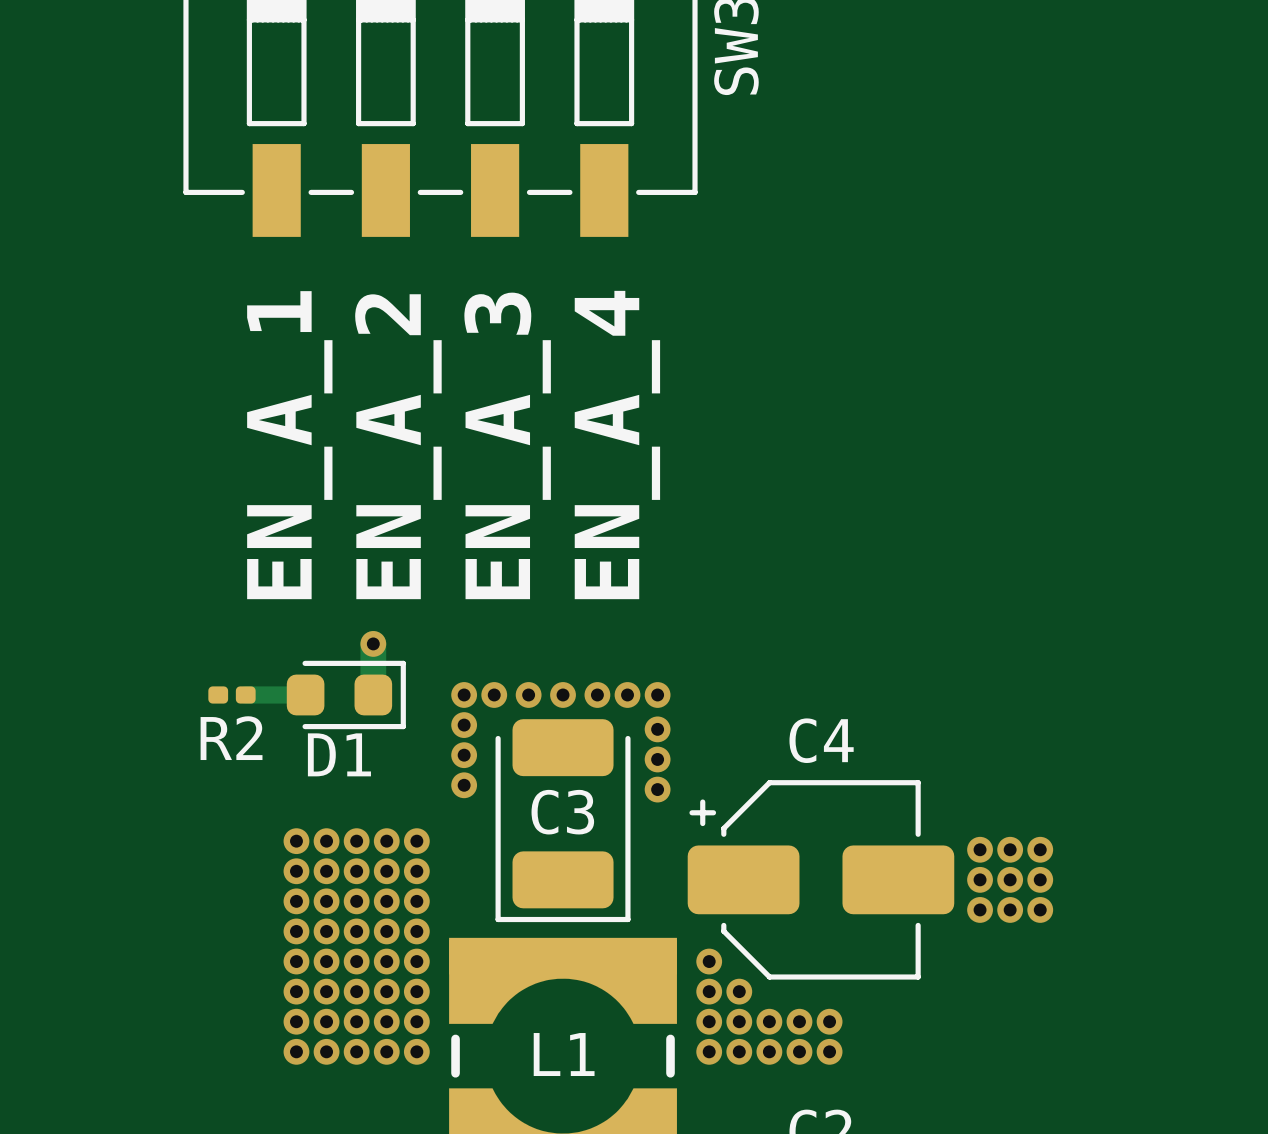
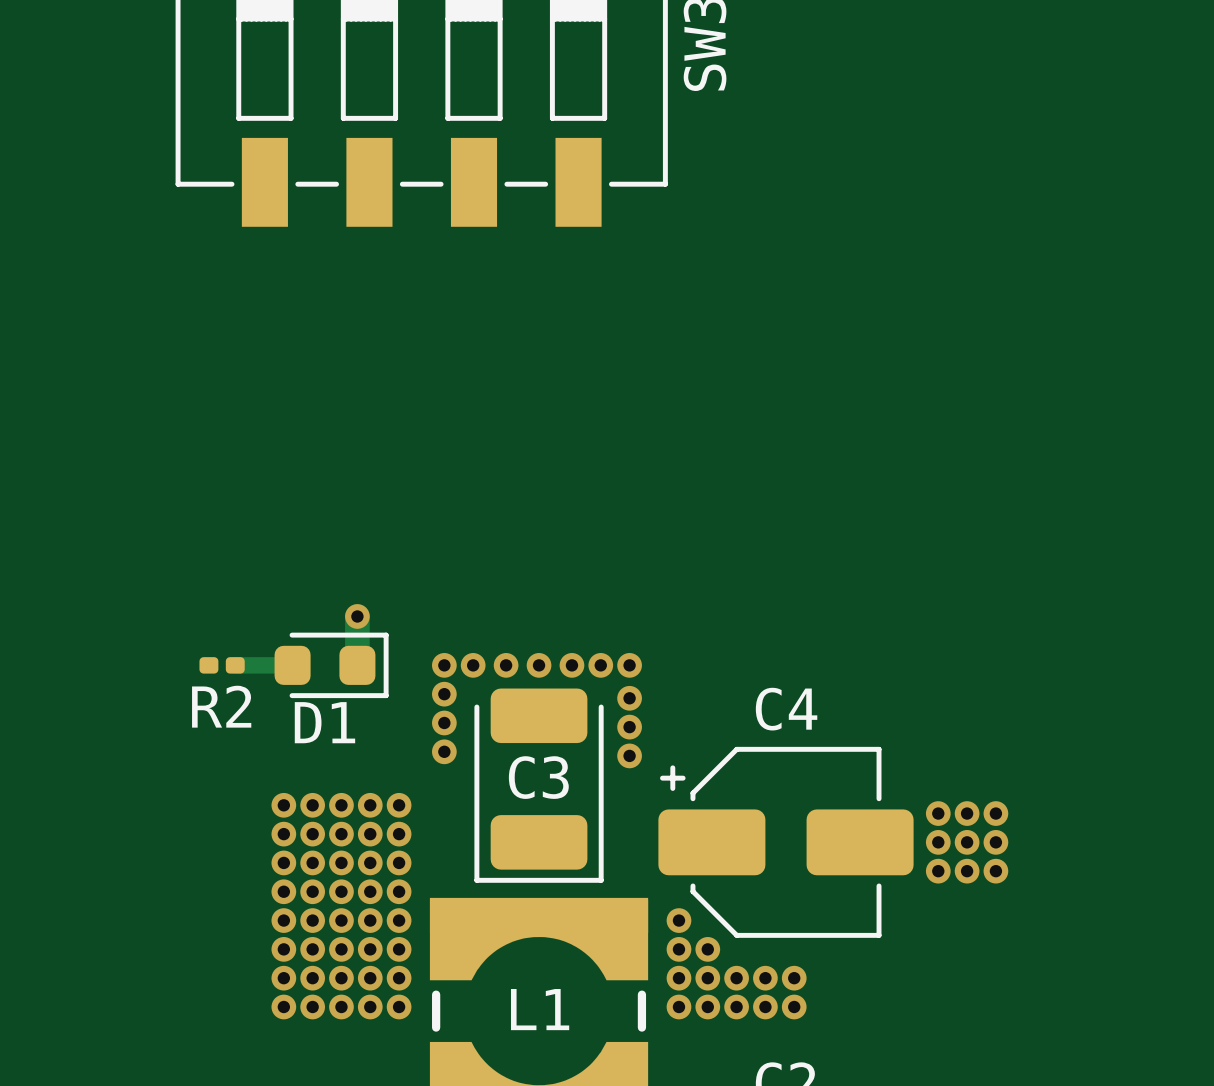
text: EN_A_1 (289, 445) -> none
text: EN_A_3 (507, 445) -> none
text: EN_A_4 (617, 445) -> none
text: EN_A_2 (398, 446) -> none

